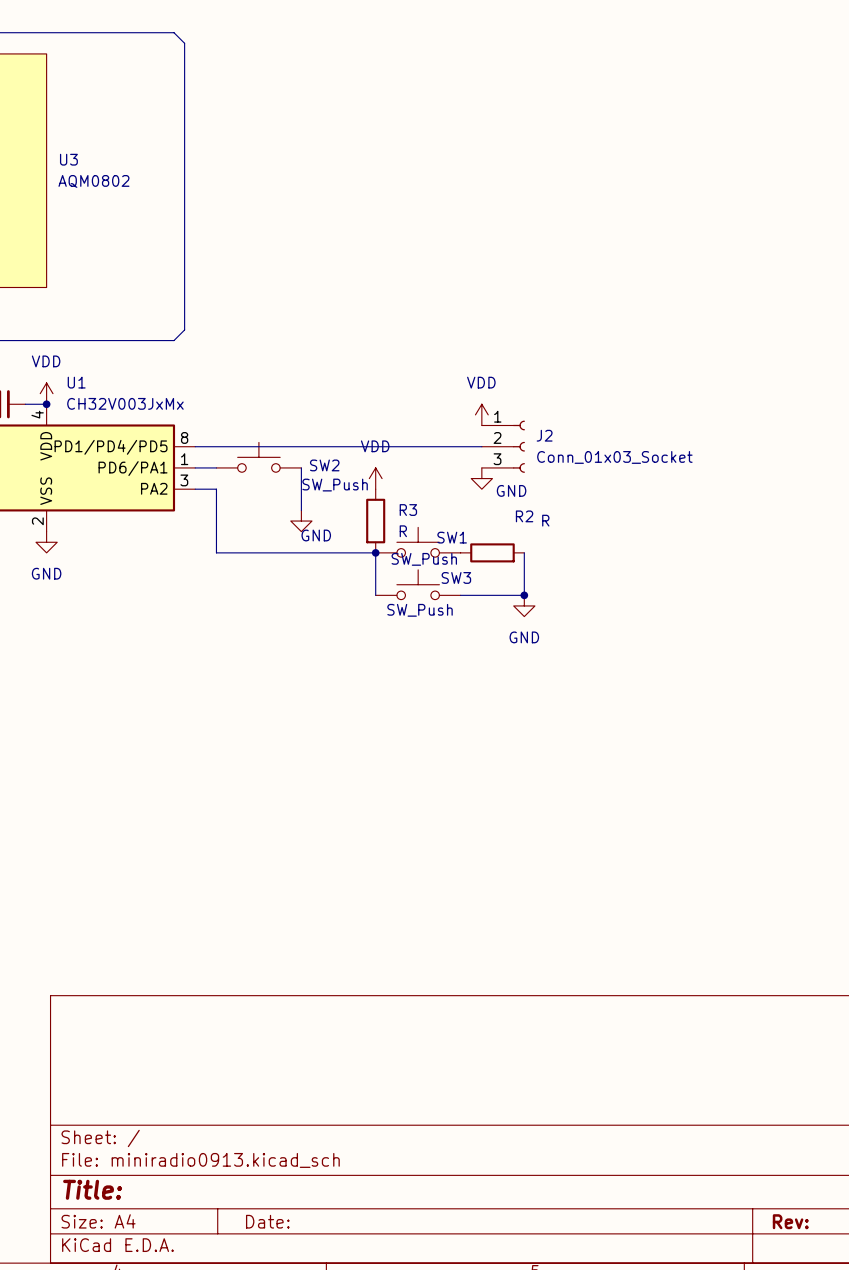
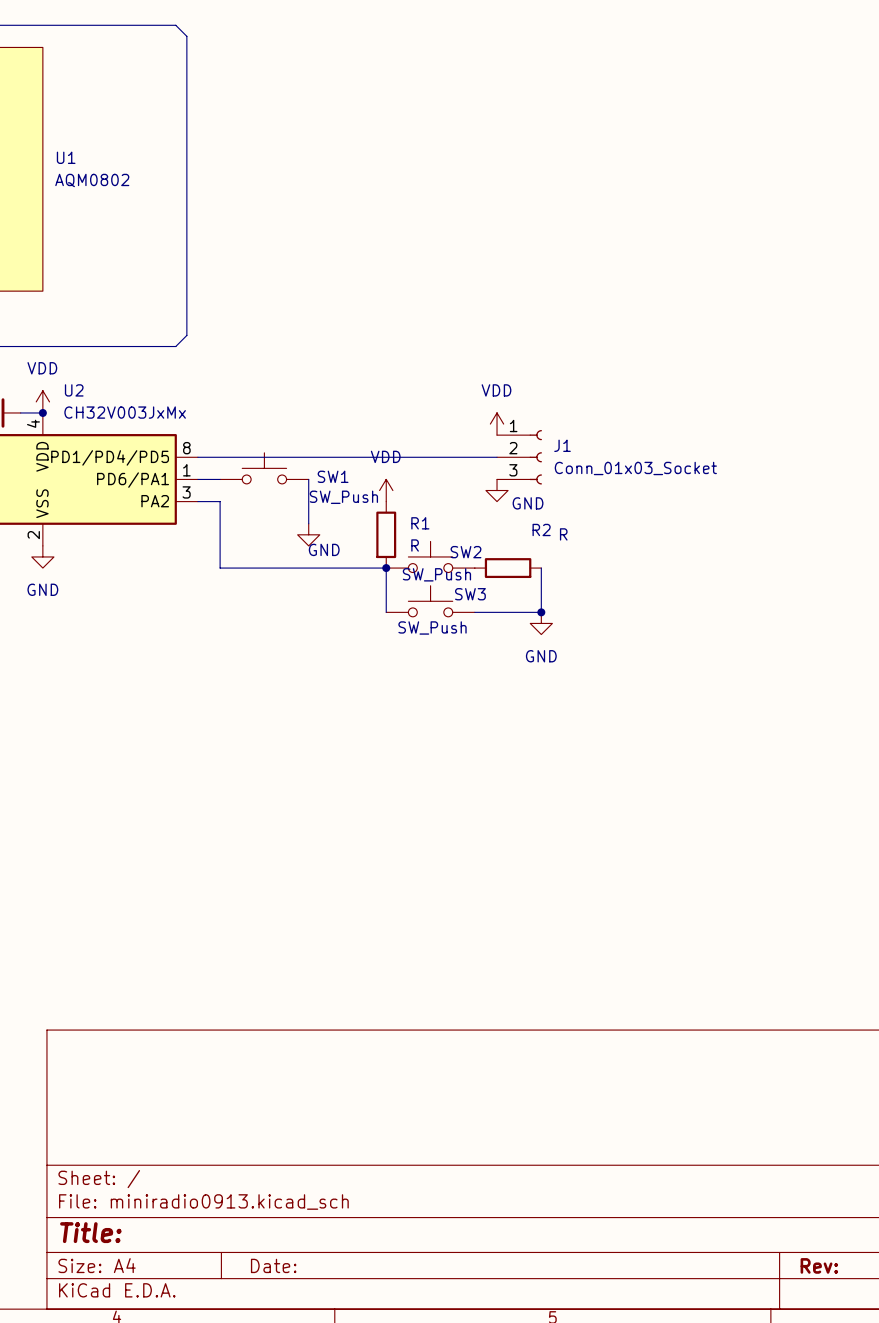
U3 name: U3 (68, 159) -> U1 (66, 157)
U1 name: U1 (76, 382) -> U2 (74, 390)
J2 name: J2 (544, 435) -> J1 (562, 445)
SW2 name: SW2 (324, 465) -> SW1 (333, 476)
R3 name: R3 (408, 510) -> R1 (420, 523)
SW1 name: SW1 (452, 537) -> SW2 (466, 552)

